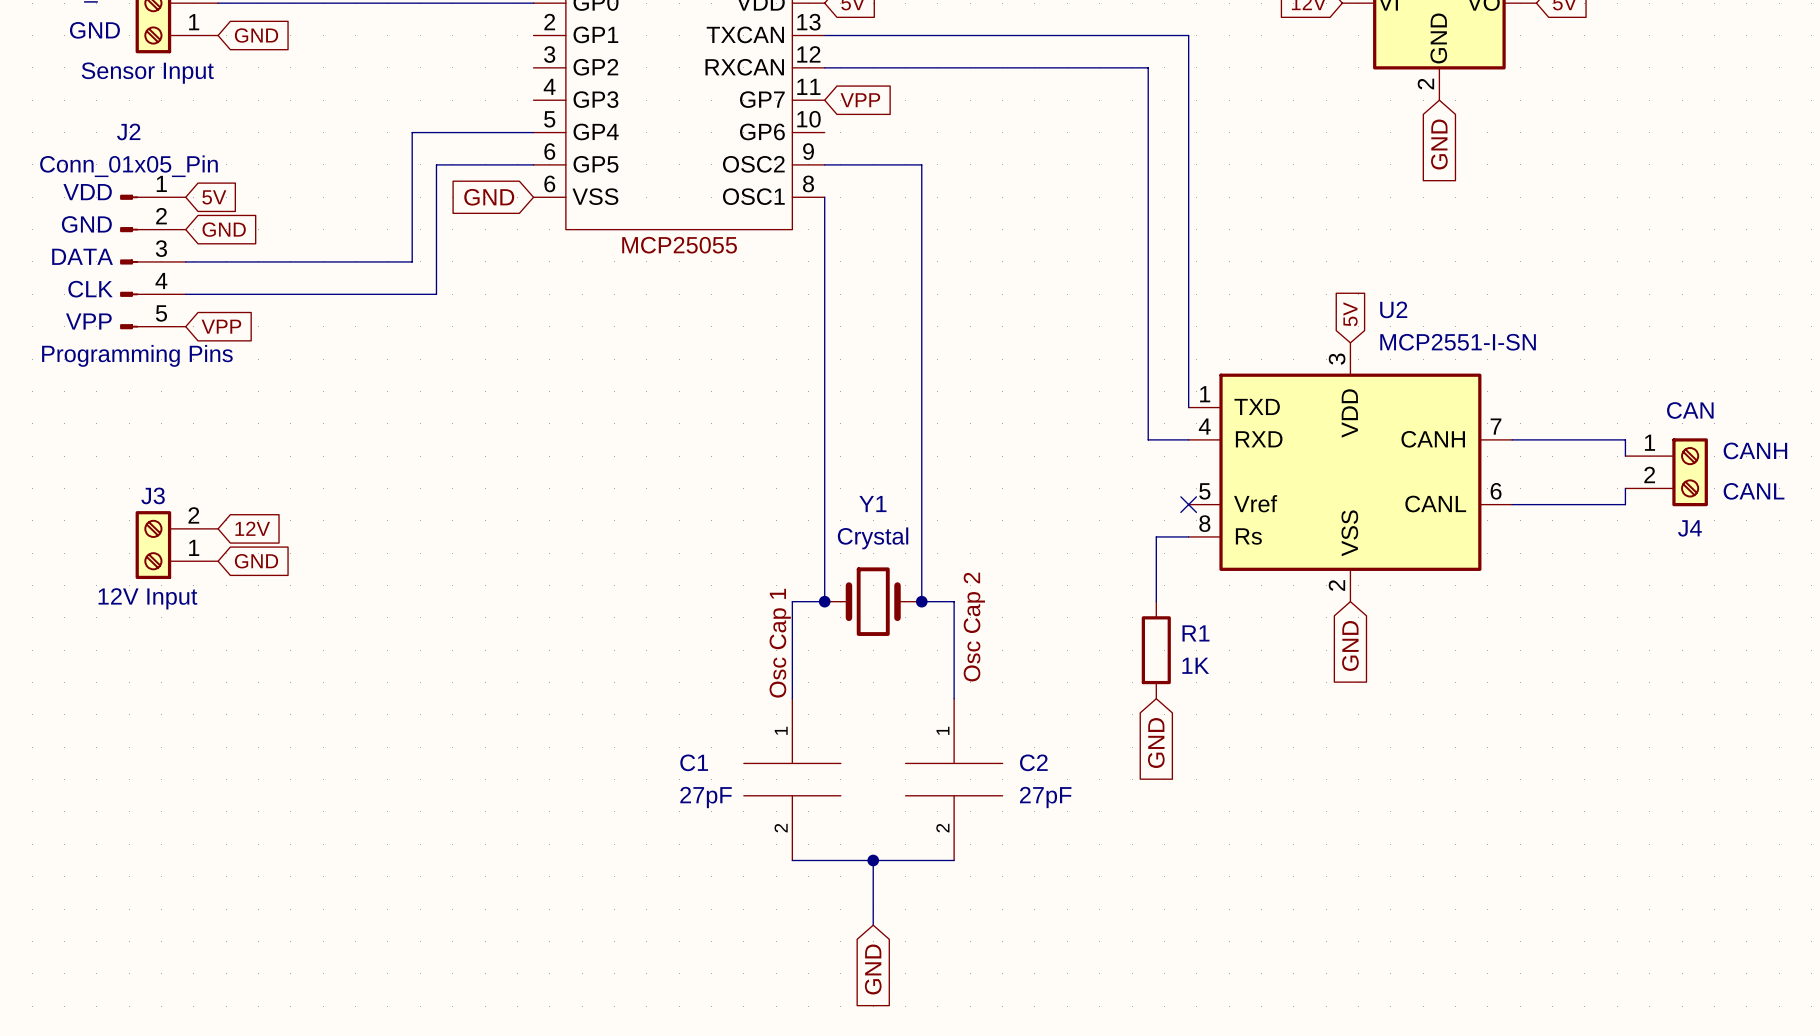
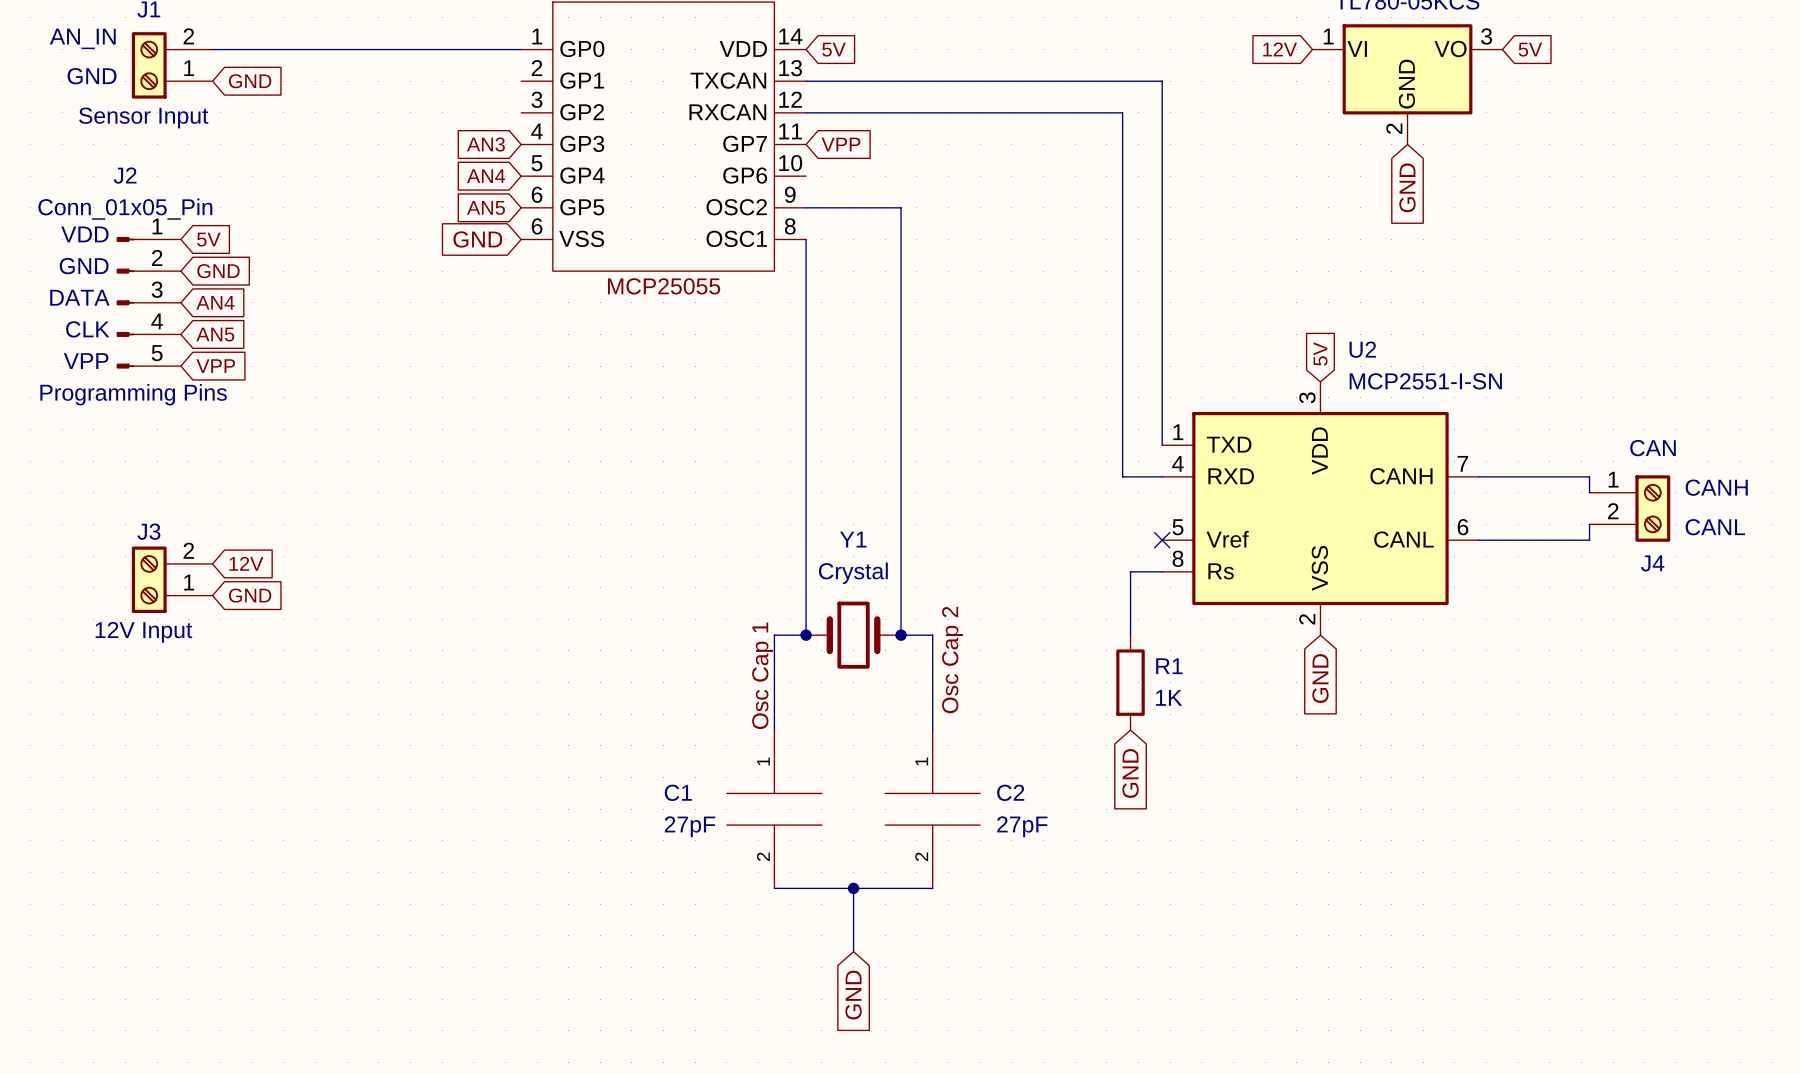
global label: none -> AN3 (485, 144)
global label: none -> AN4 (486, 176)
wire: (533, 132) (412, 132) (412, 261) (185, 261) -> none
wire: (533, 164) (436, 164) (436, 294) (185, 294) -> none
global label: none -> AN5 (485, 207)
global label: none -> AN4 (215, 302)
global label: none -> AN5 (215, 334)

